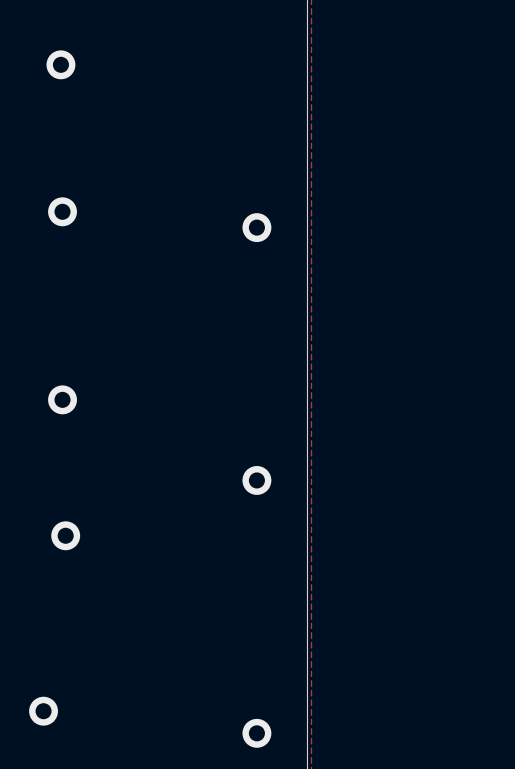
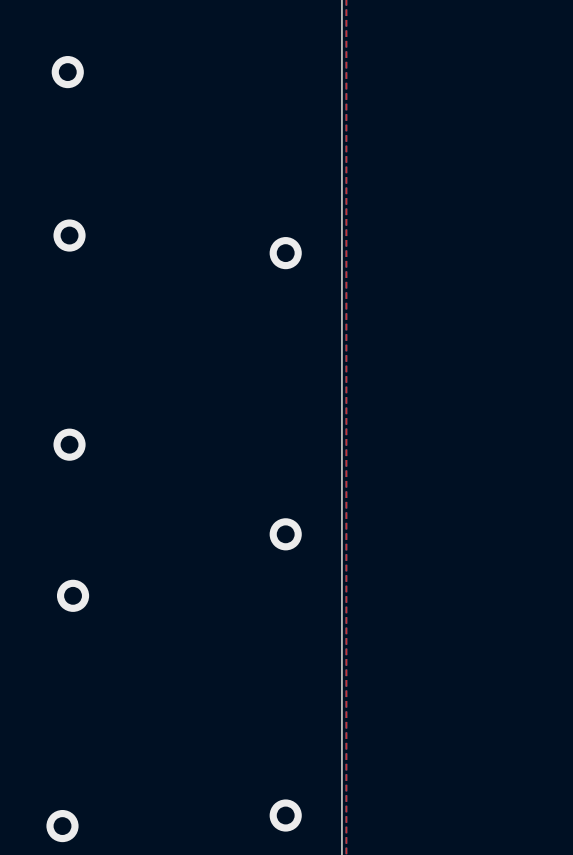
via position: (43, 711) -> (62, 826)

